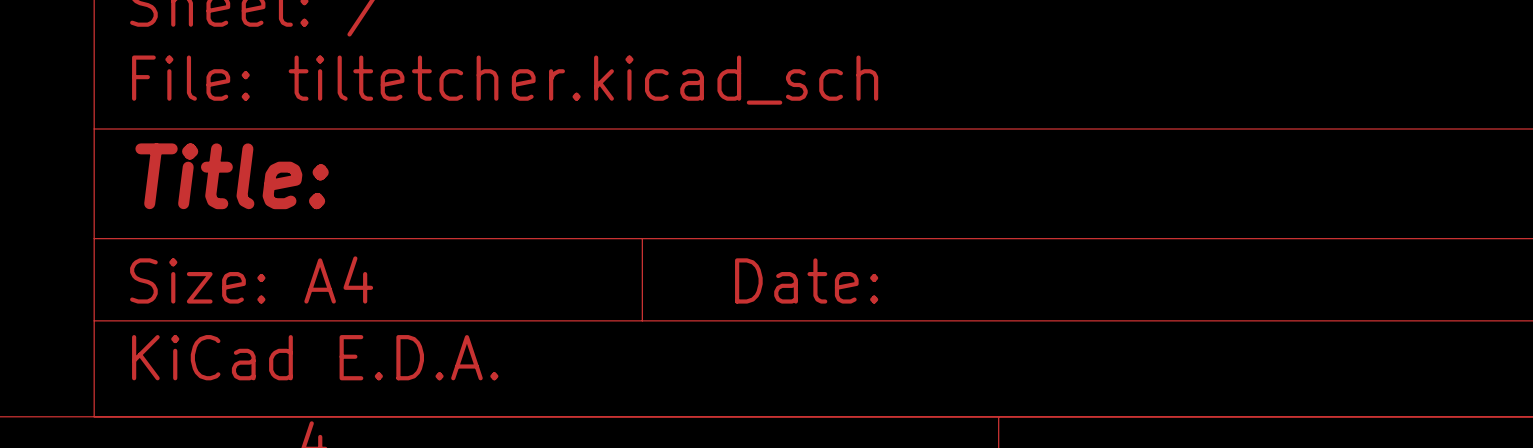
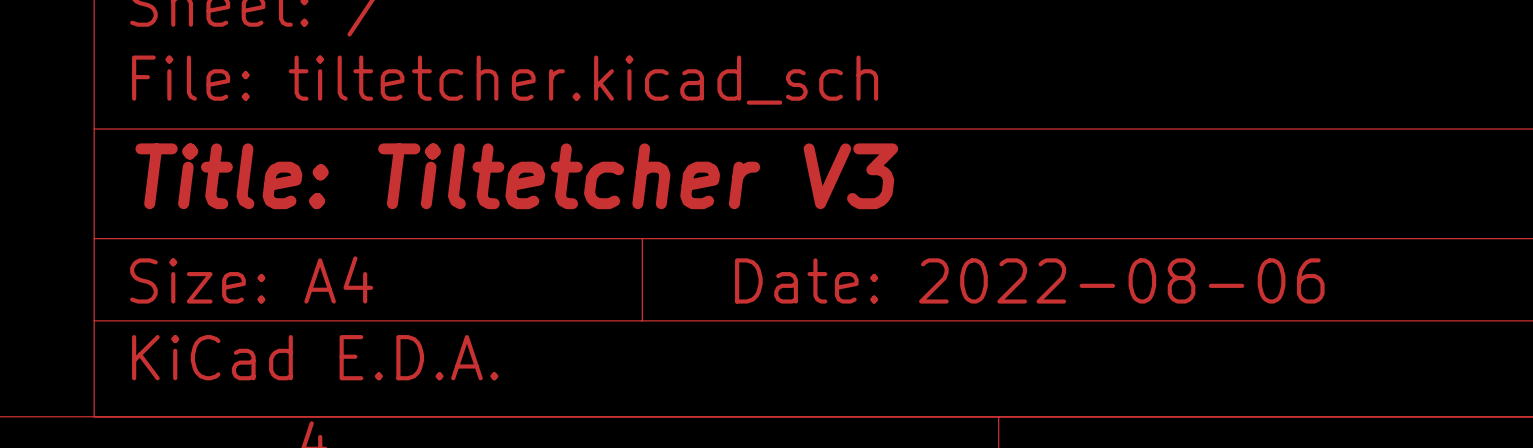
title block: Title: (232, 176) -> Title: Tiltetcher V3 (516, 176)
title block: Date: (806, 280) -> Date: 2022-08-06 (1029, 280)

